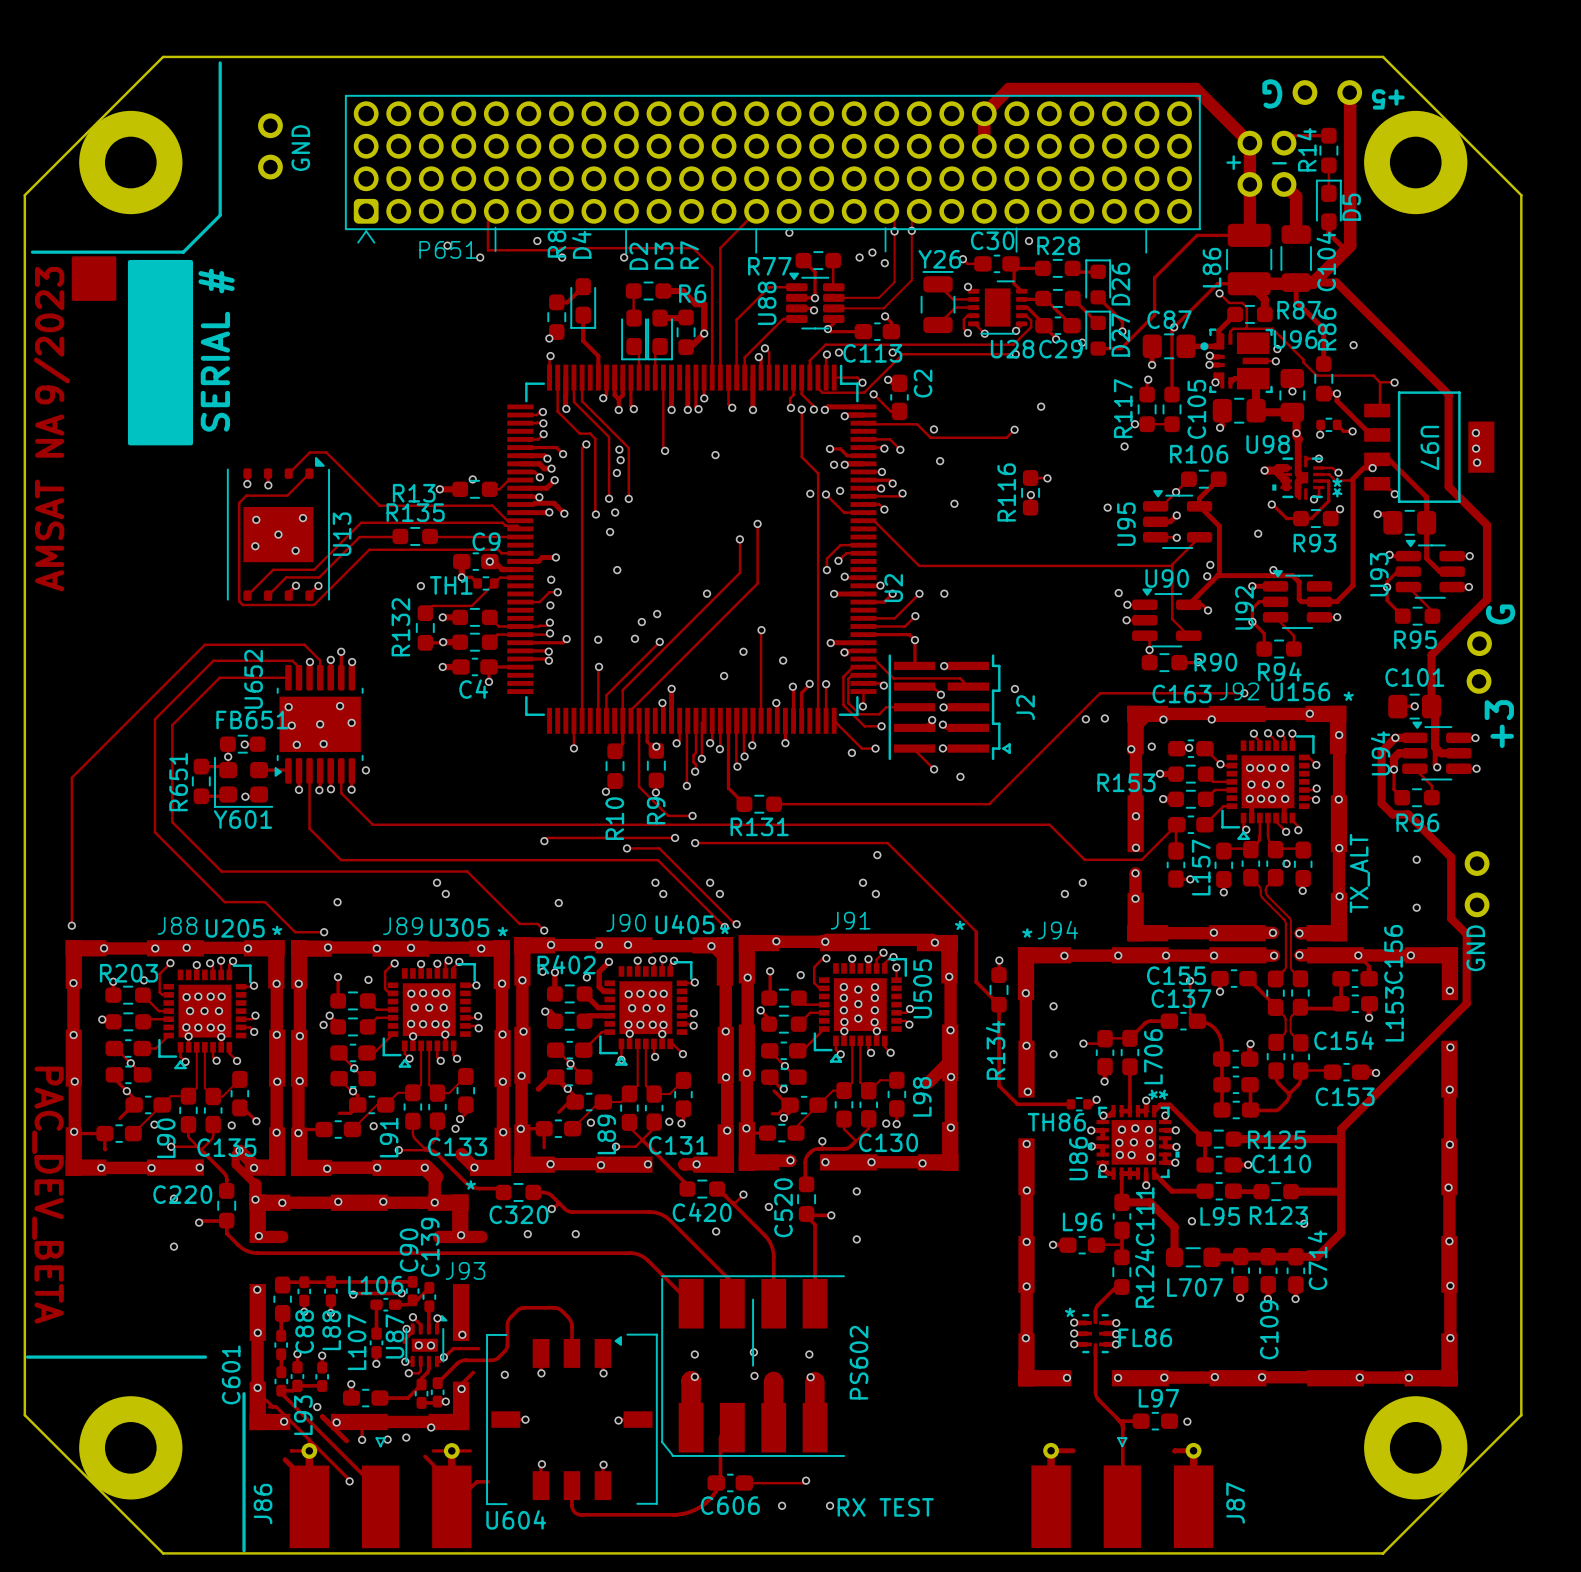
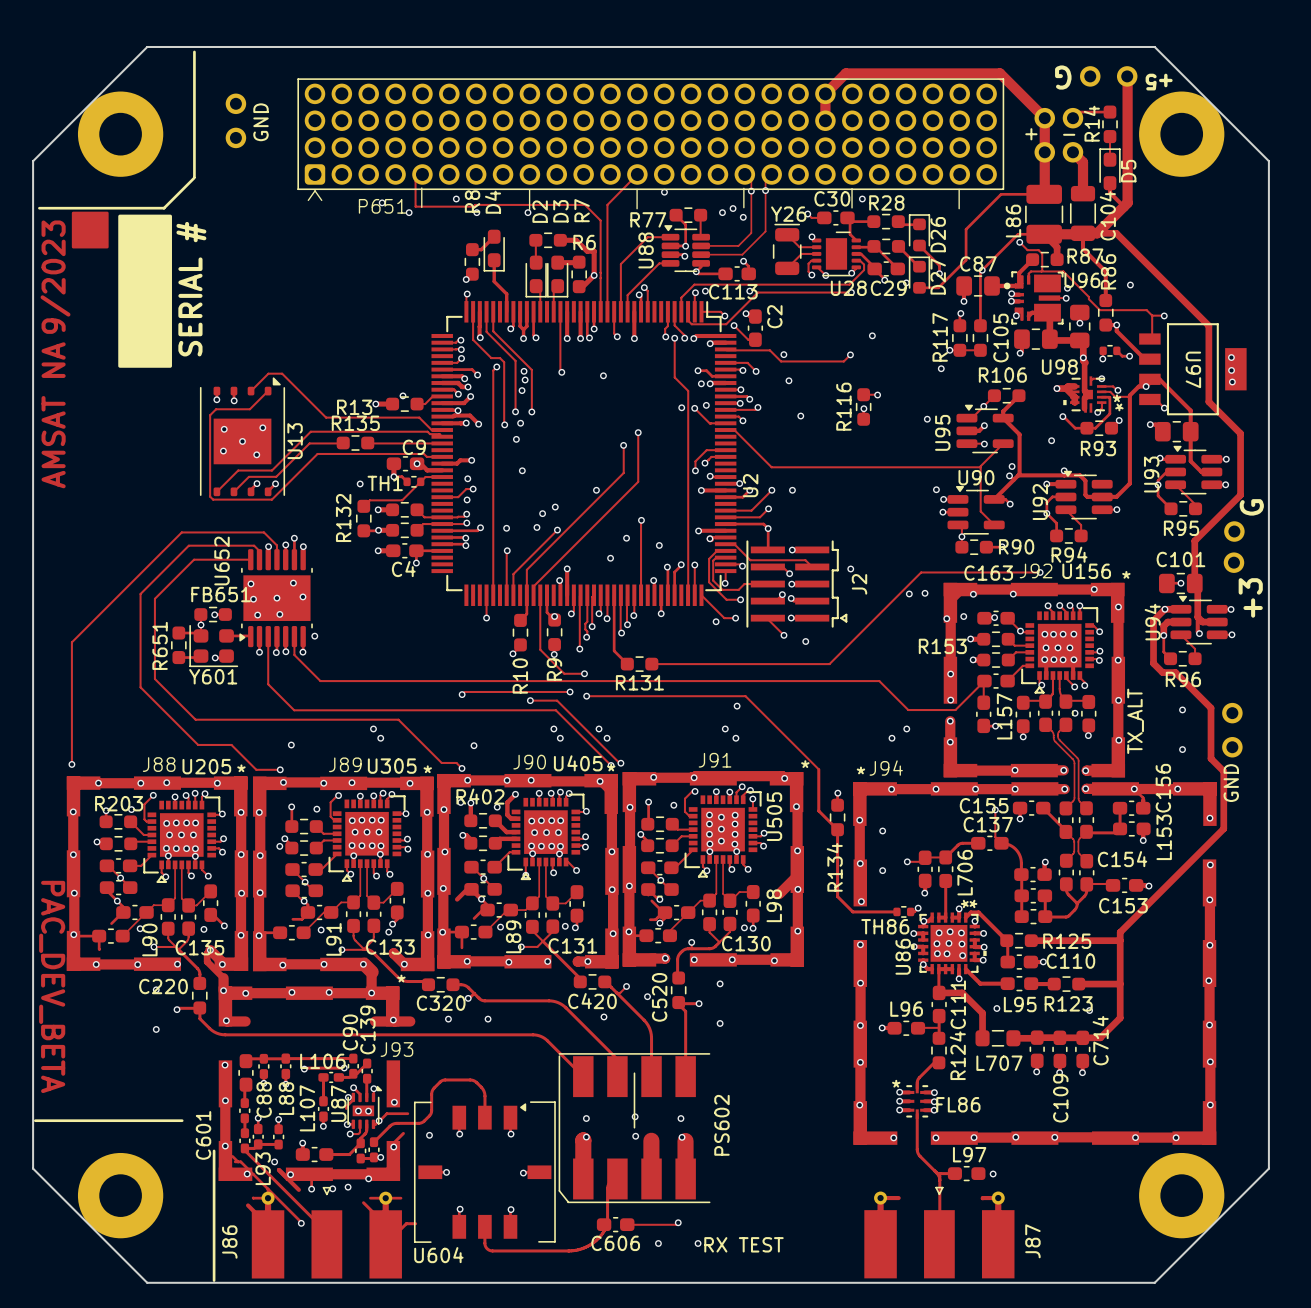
U98 footprint: [1272, 455, 1325, 500] -> [1063, 376, 1107, 413]

